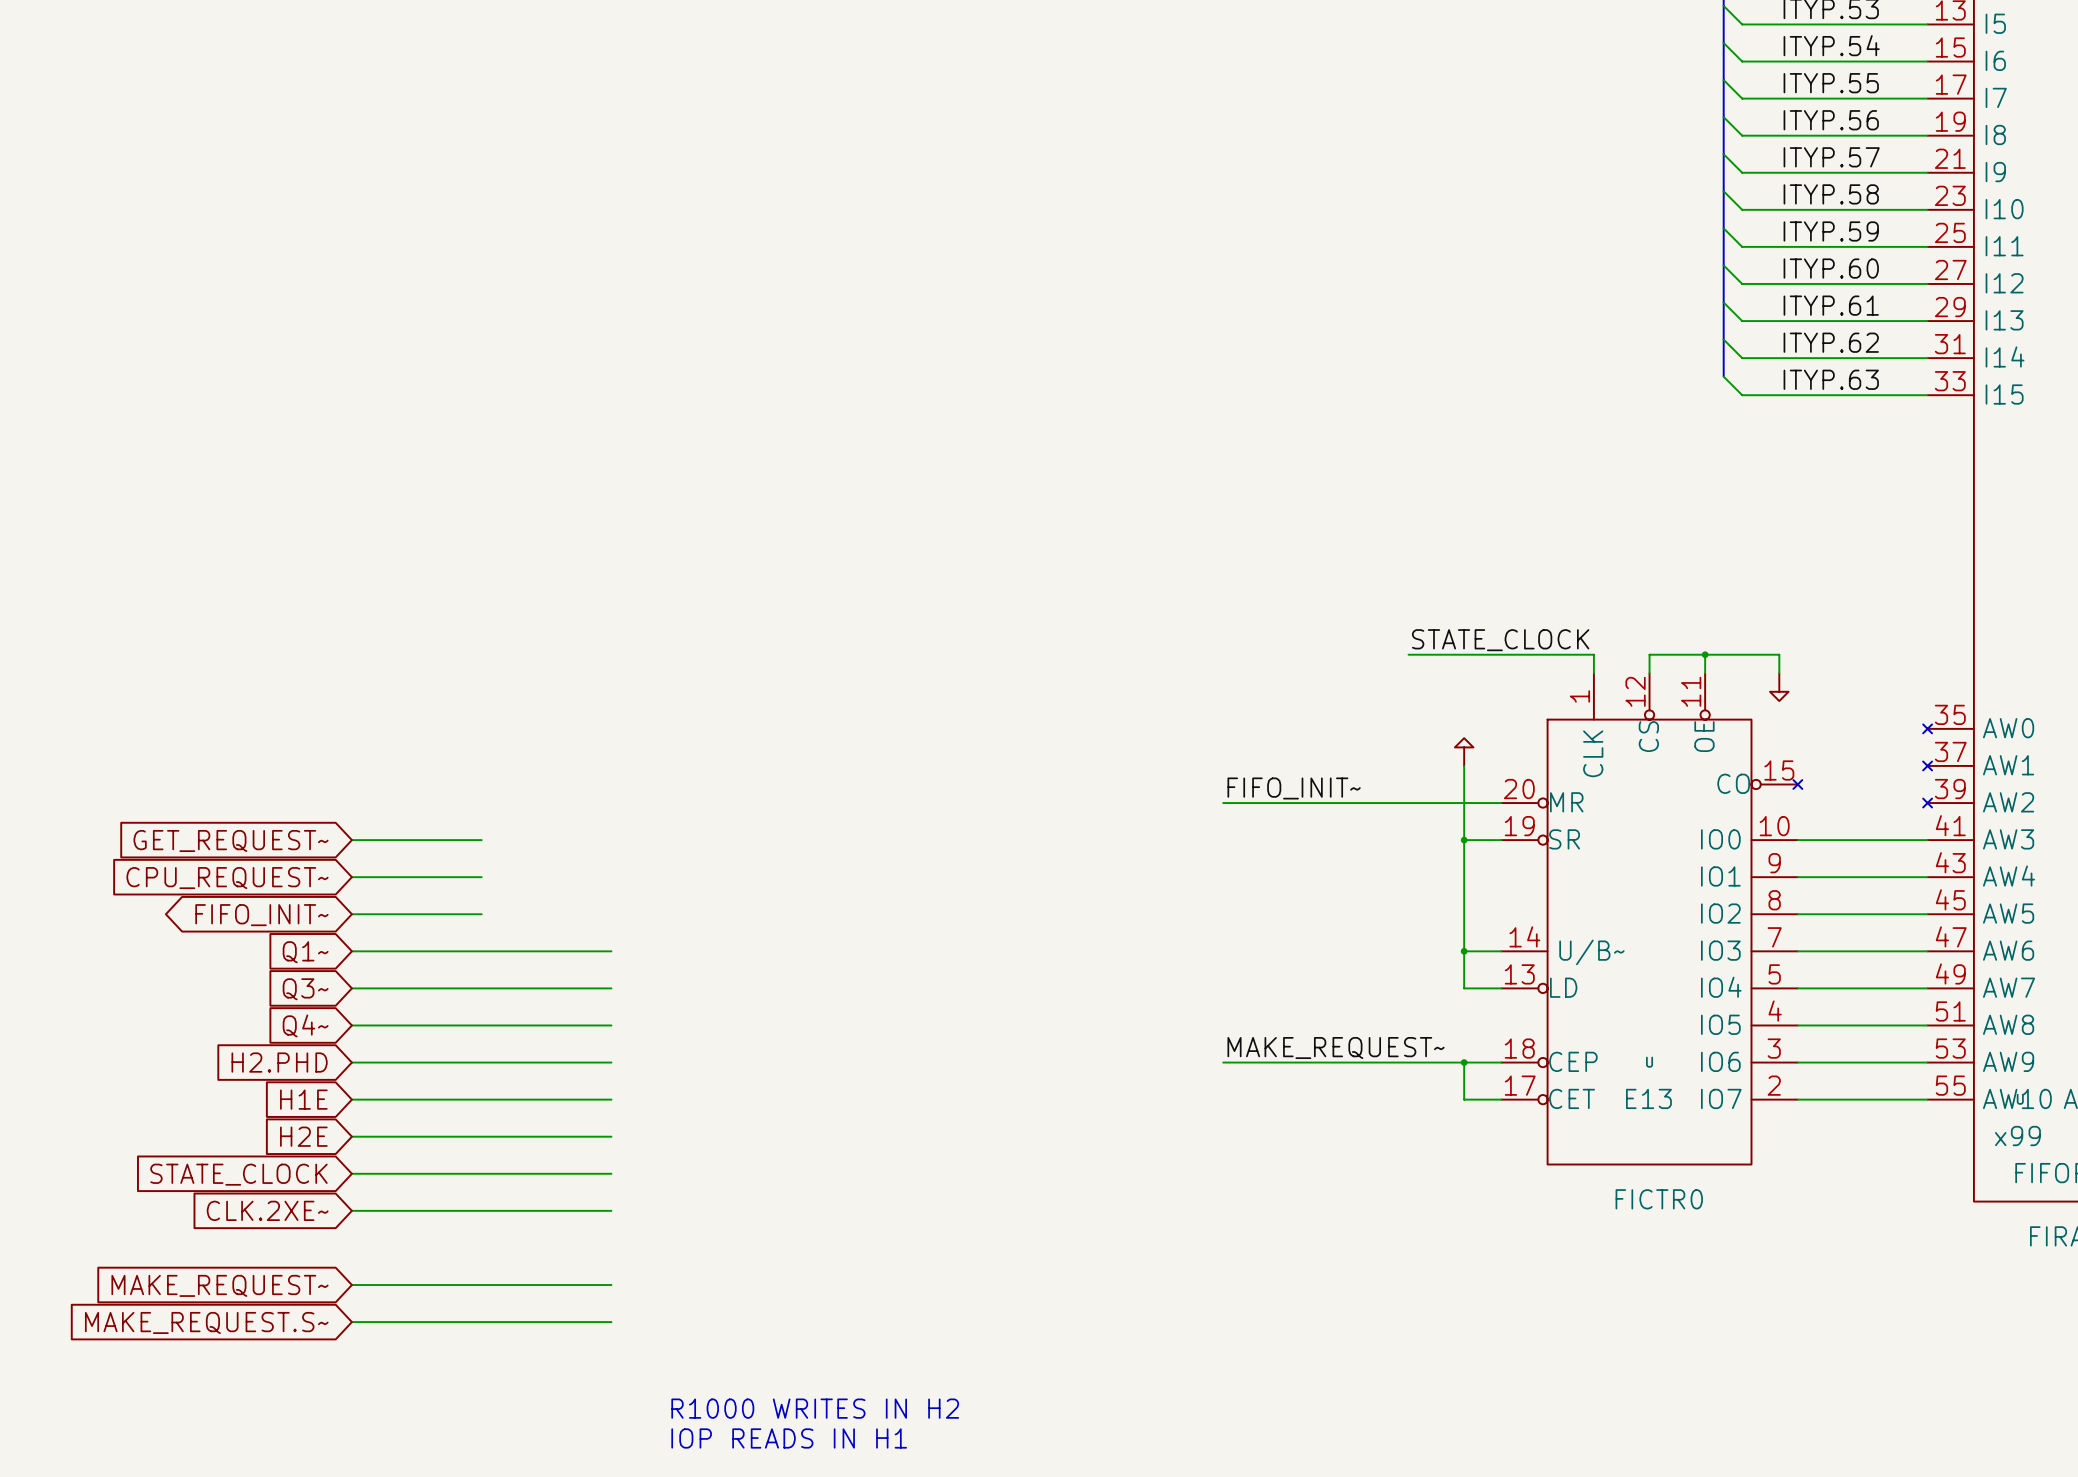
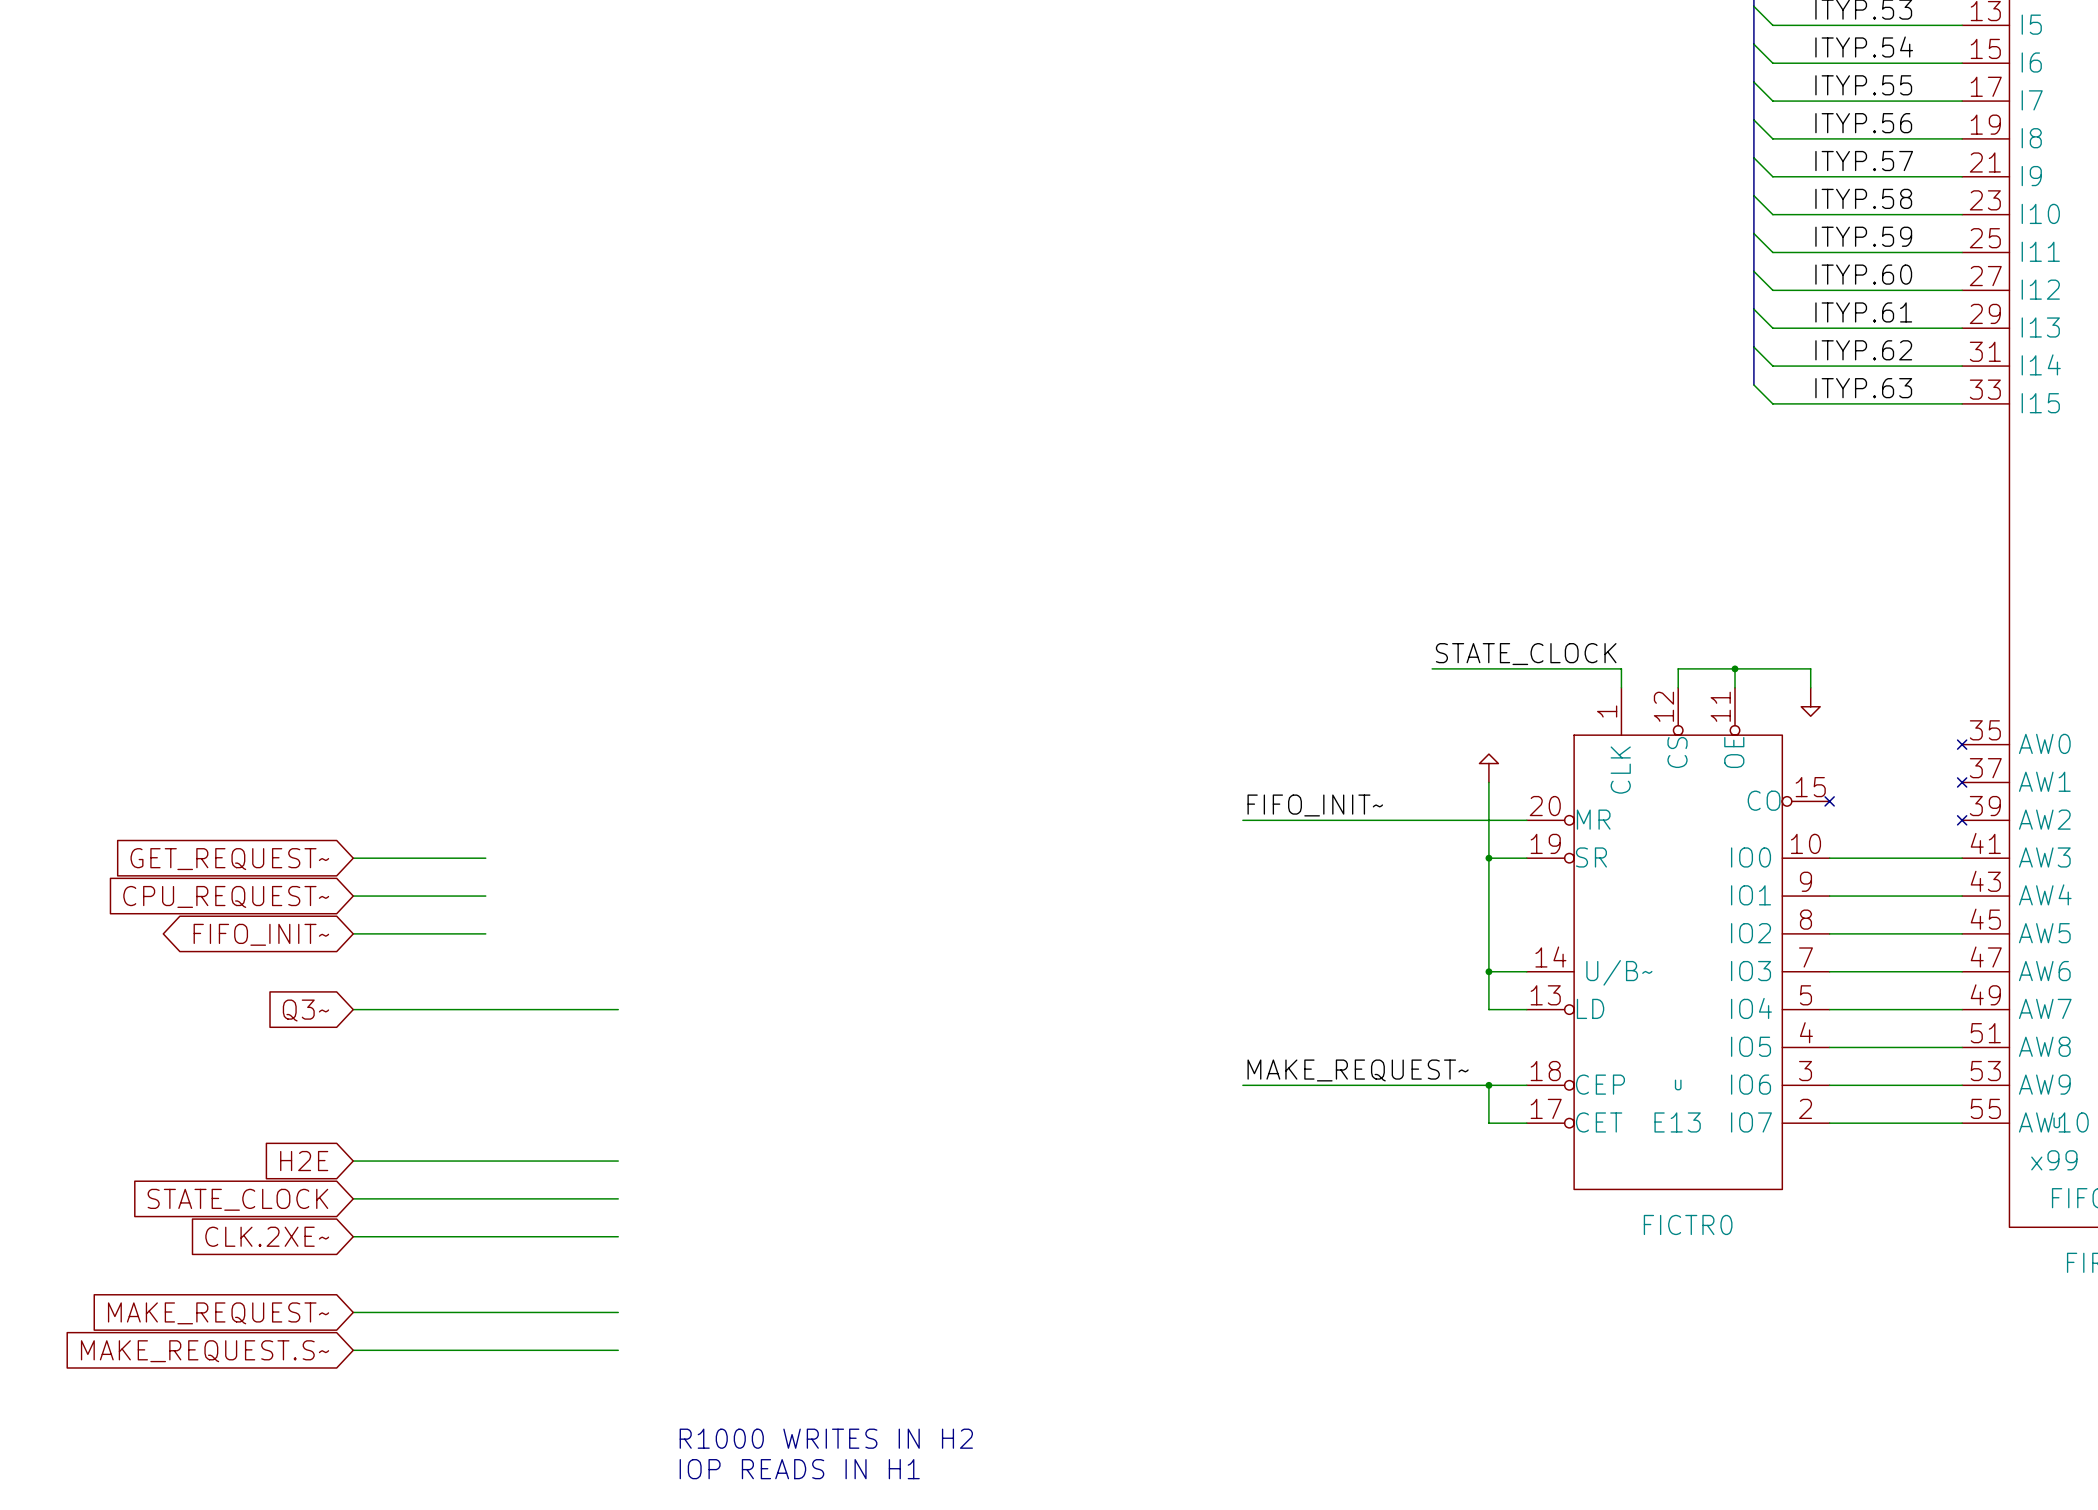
wire: (351, 951) (611, 951) -> none
global label: Q1~ (305, 952) -> none
global label: Q4~ (305, 1025) -> none
wire: (351, 1025) (611, 1025) -> none
global label: H2.PHD (279, 1062) -> none
wire: (351, 1062) (611, 1062) -> none
global label: H1E (303, 1099) -> none
wire: (351, 1099) (611, 1099) -> none

